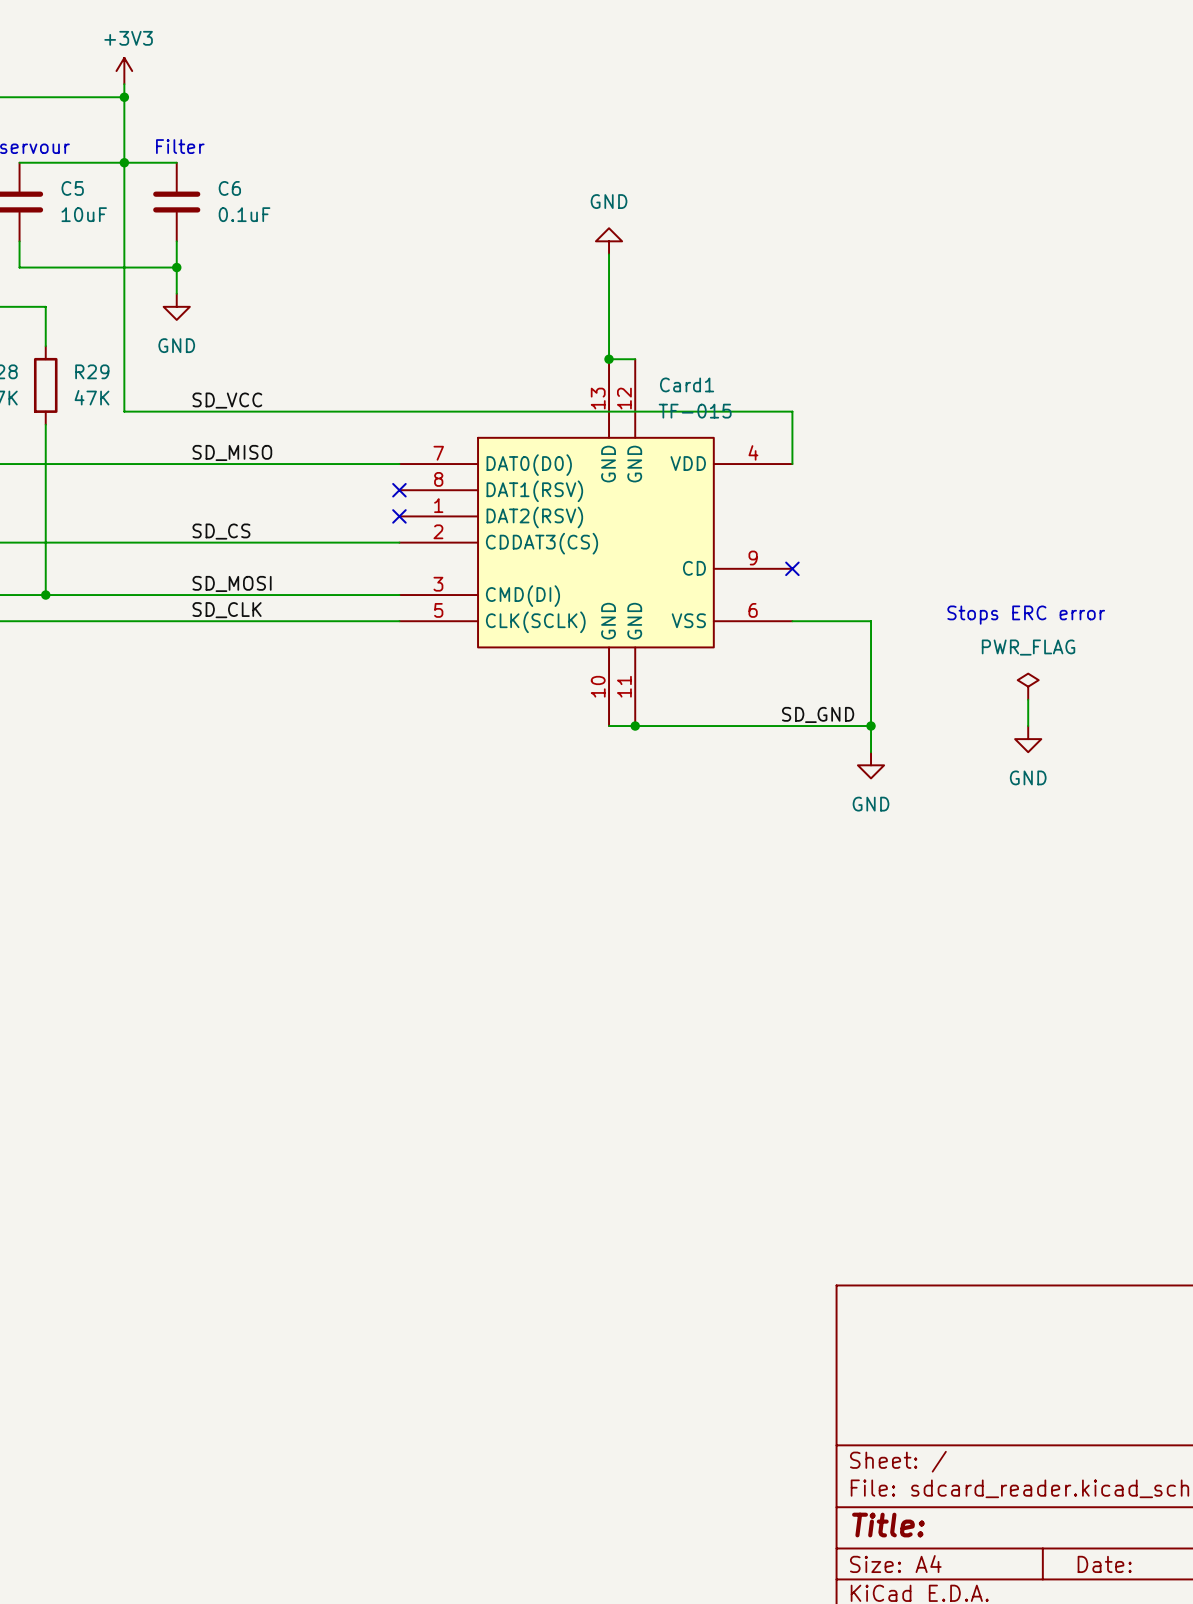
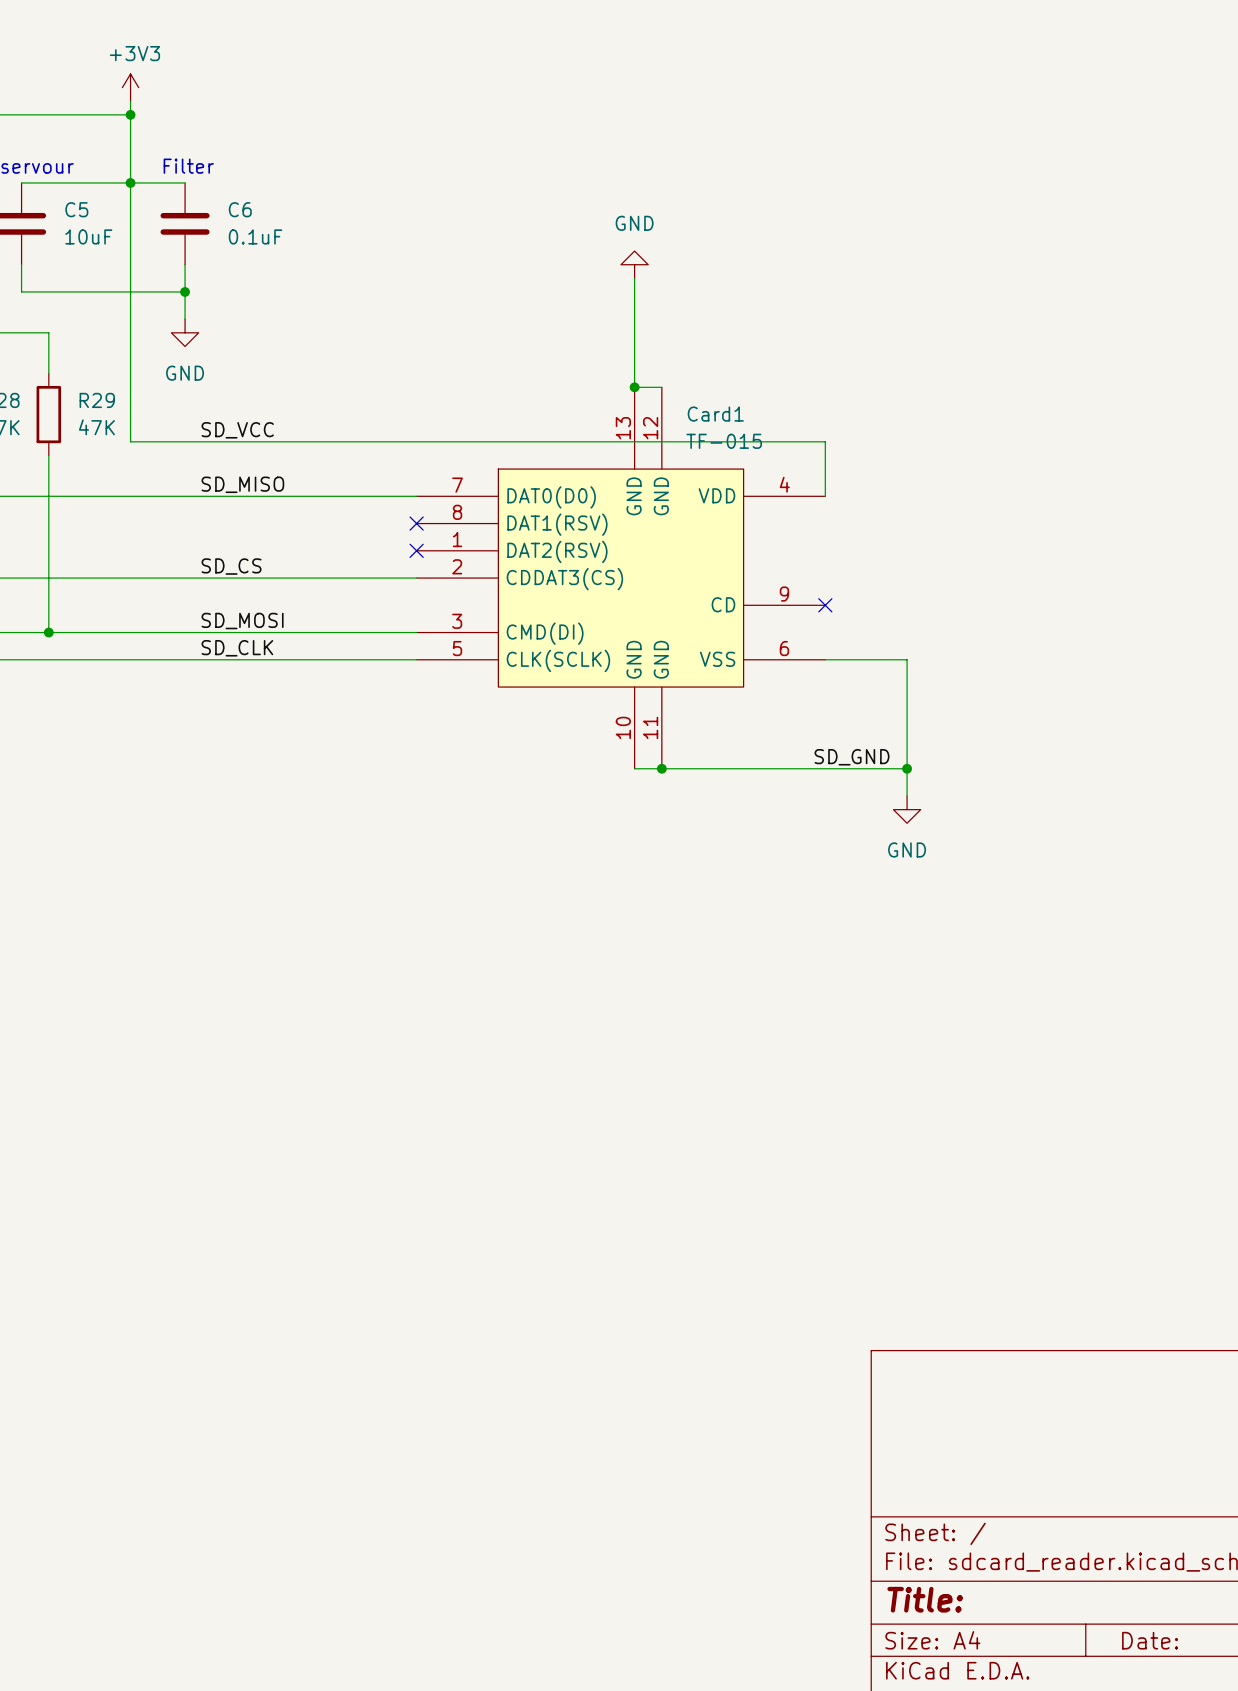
text: Stops ERC error (1026, 615) -> none
power symbol: PWR_FLAG (1028, 686) -> none
wire: (1028, 699) (1028, 726) -> none
power symbol: GND (1028, 739) -> none

